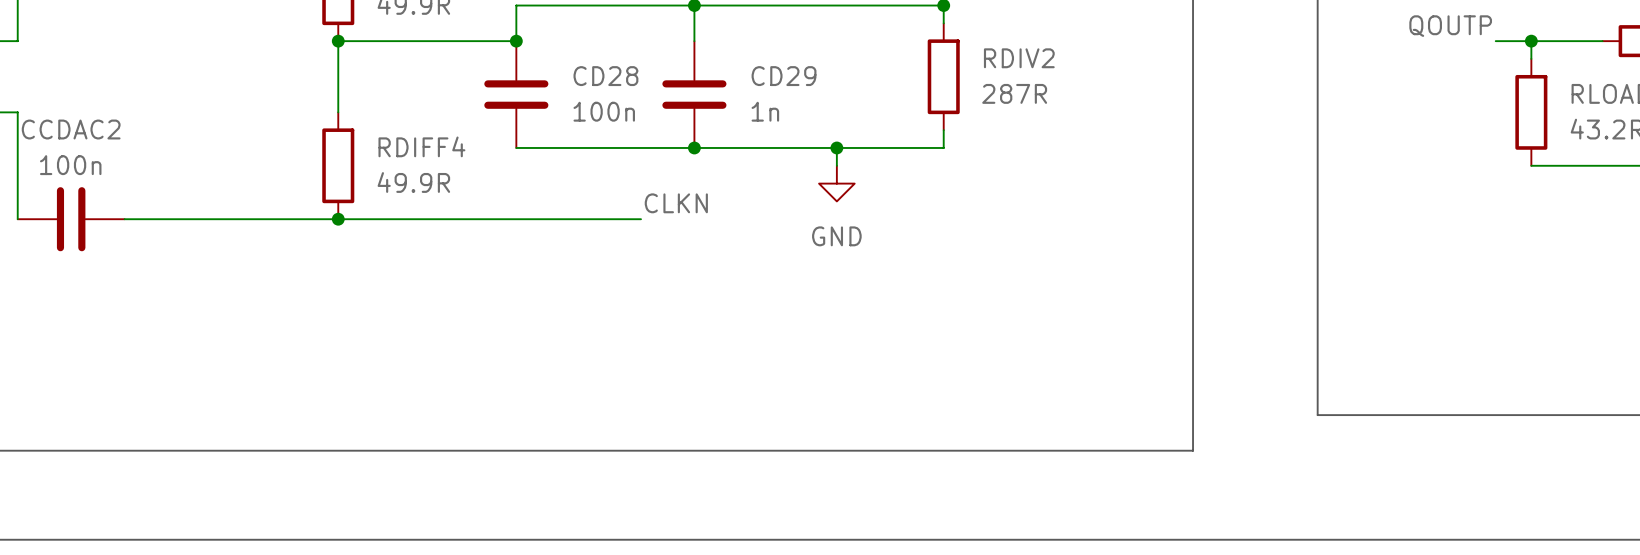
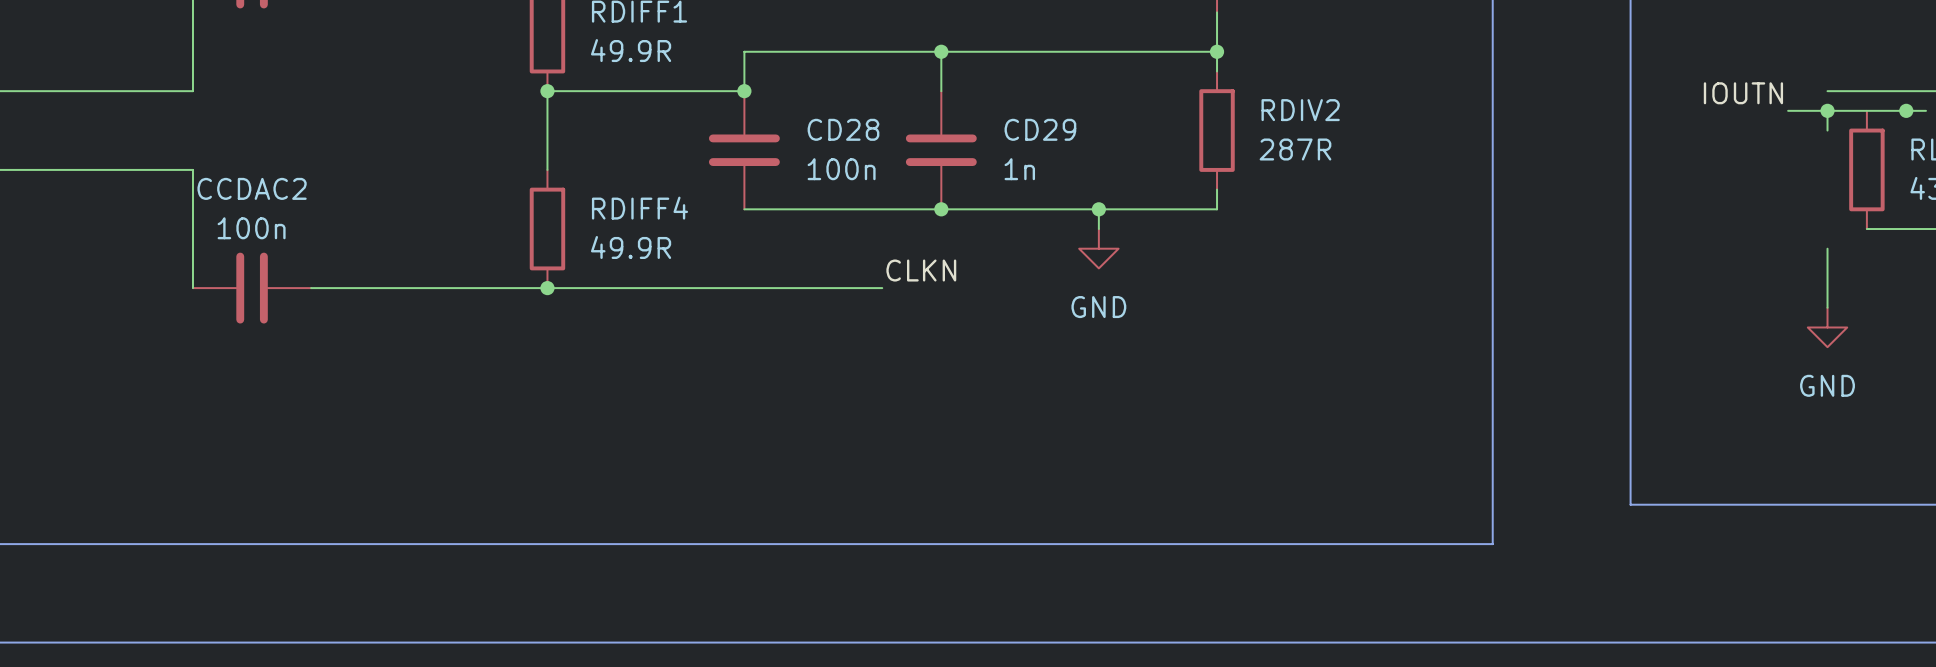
label: QOUTP (1450, 26) -> none
wire: (1531, 41) (1531, 58) -> (1827, 110) (1827, 130)
junction: (1531, 41) -> none
label: none -> IOUTN (1743, 93)
wire: none -> (1788, 110) (1925, 110)
junction: none -> (1827, 110)
junction: none -> (1906, 110)
wire: none -> (1827, 248) (1827, 307)
power symbol: none -> GND (1827, 327)

